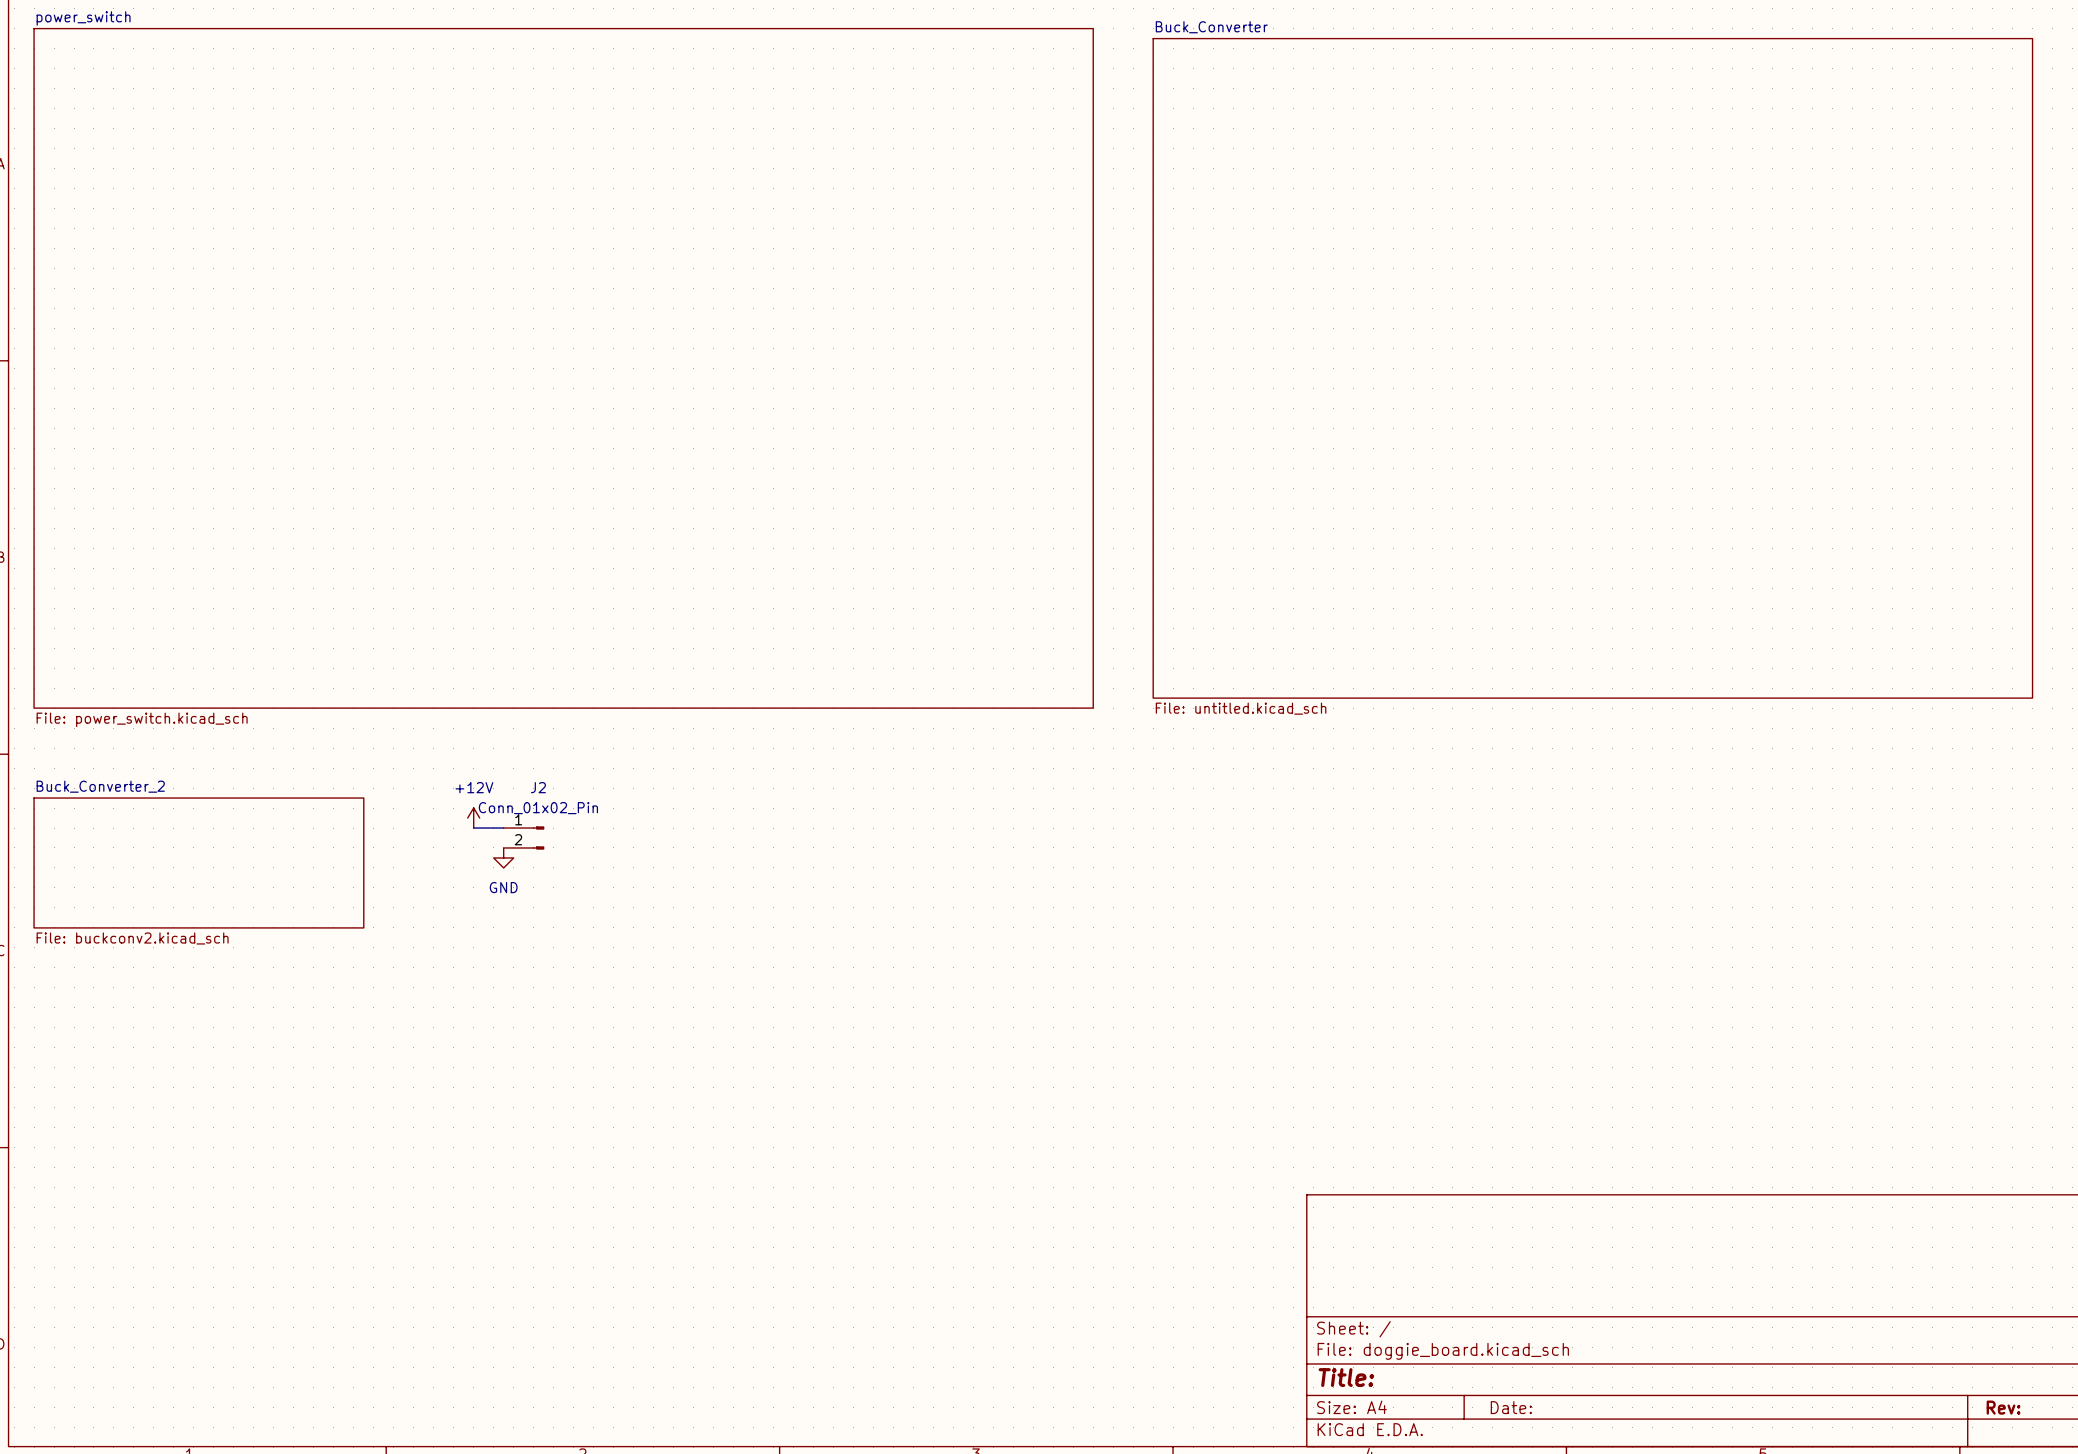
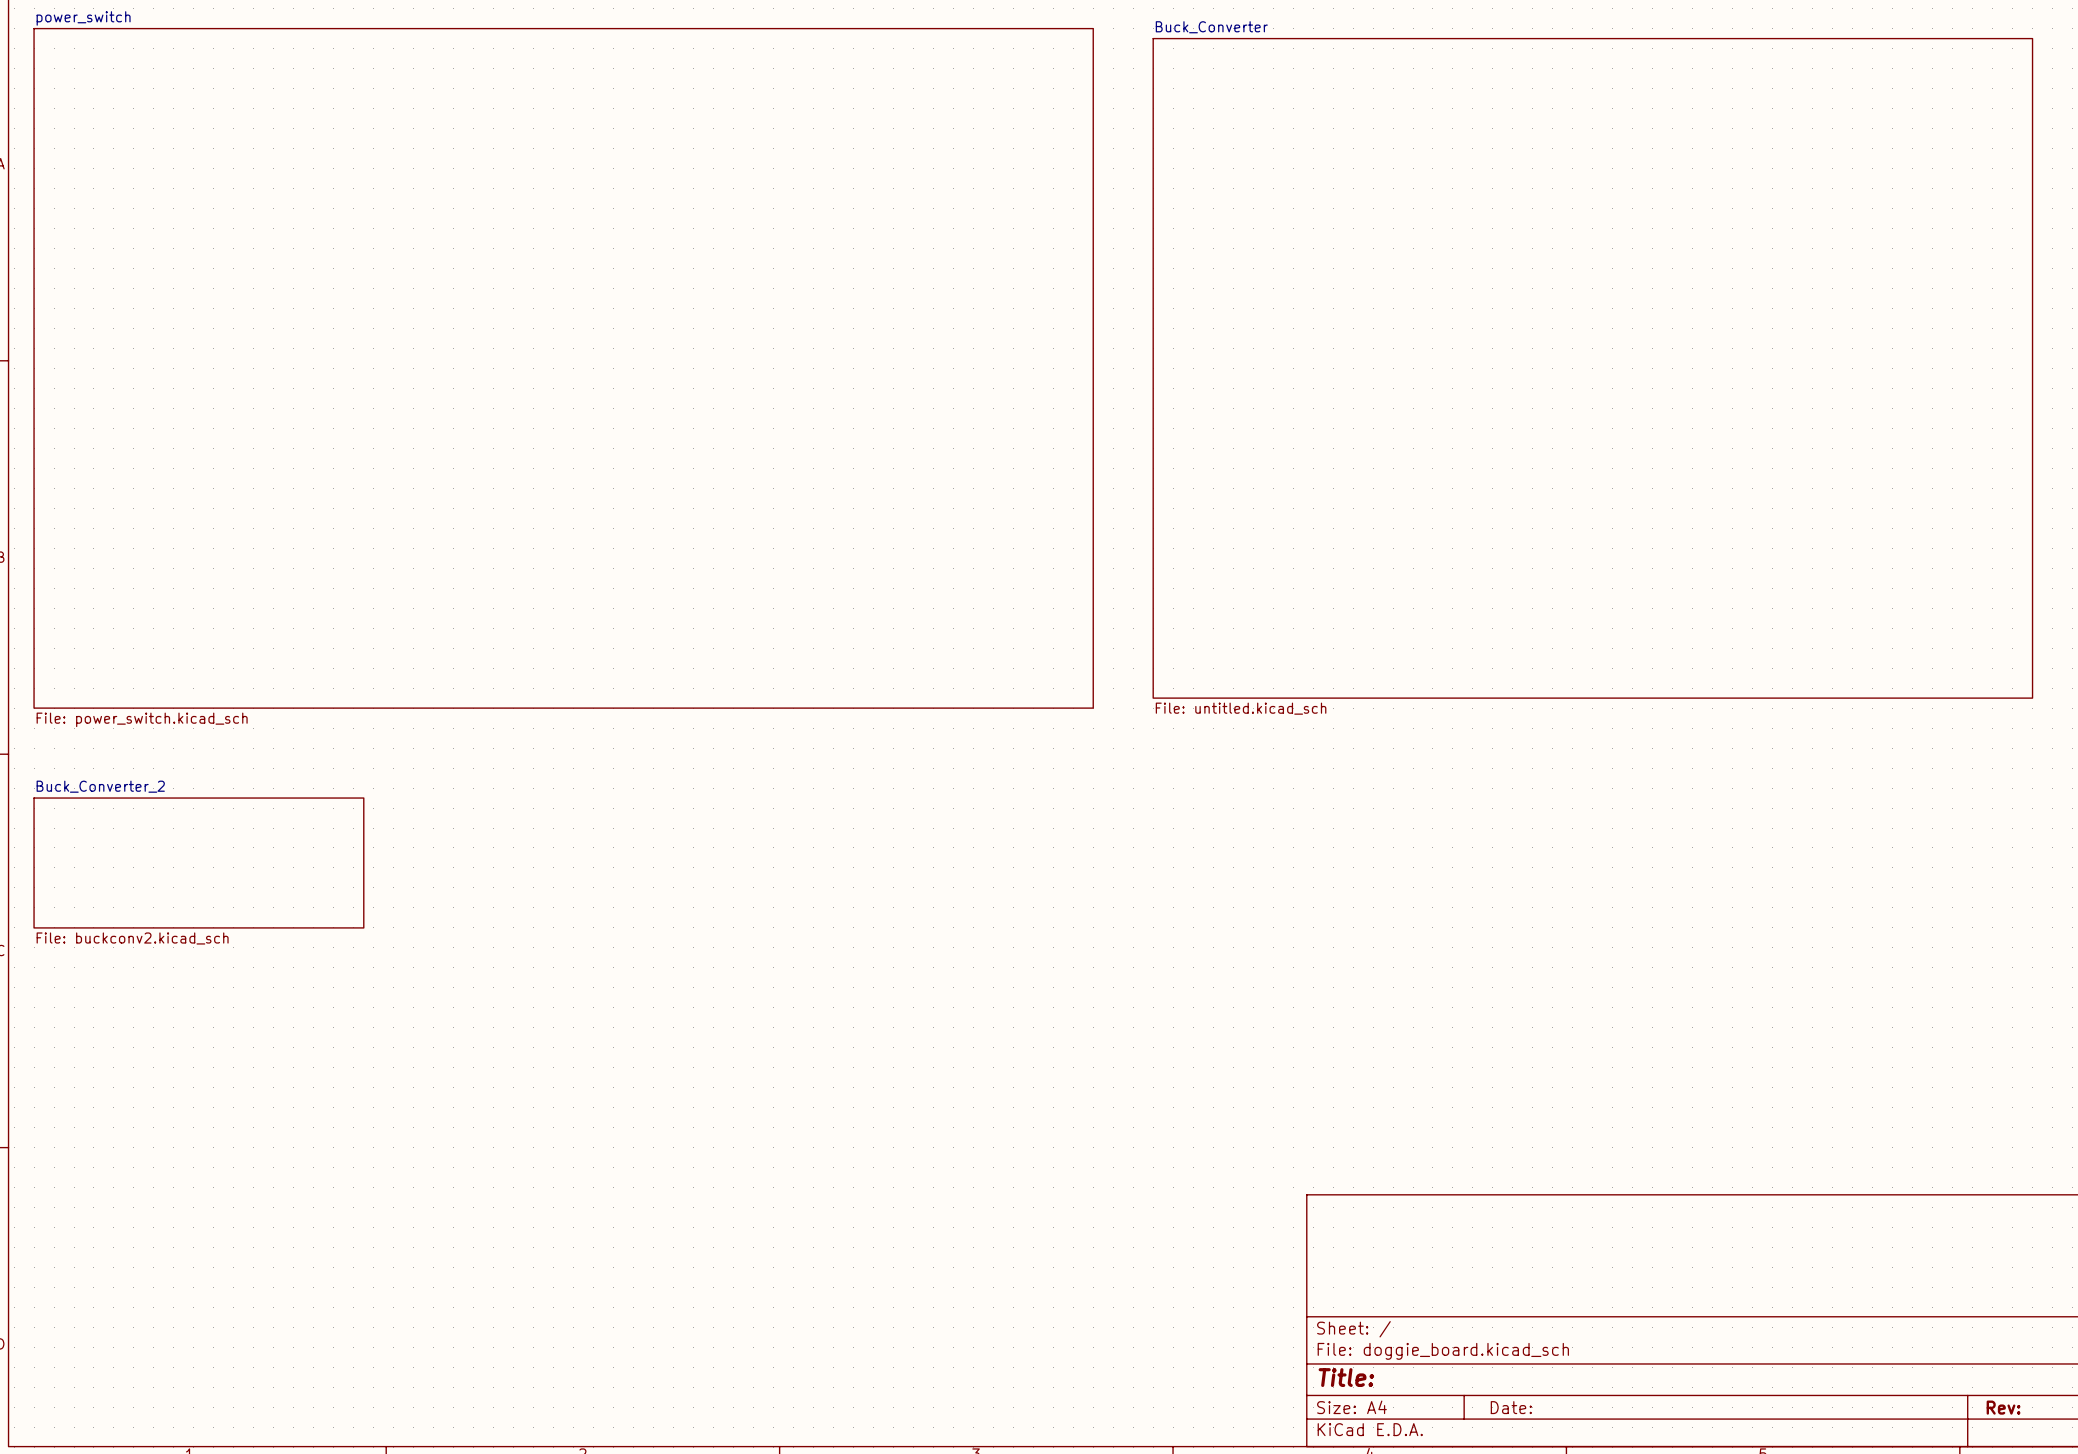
power symbol: +12V (473, 818) -> none
wire: (473, 828) (503, 828) -> none
J2: Conn_01x02_Pin (523, 838) -> none
power symbol: GND (503, 857) -> none

